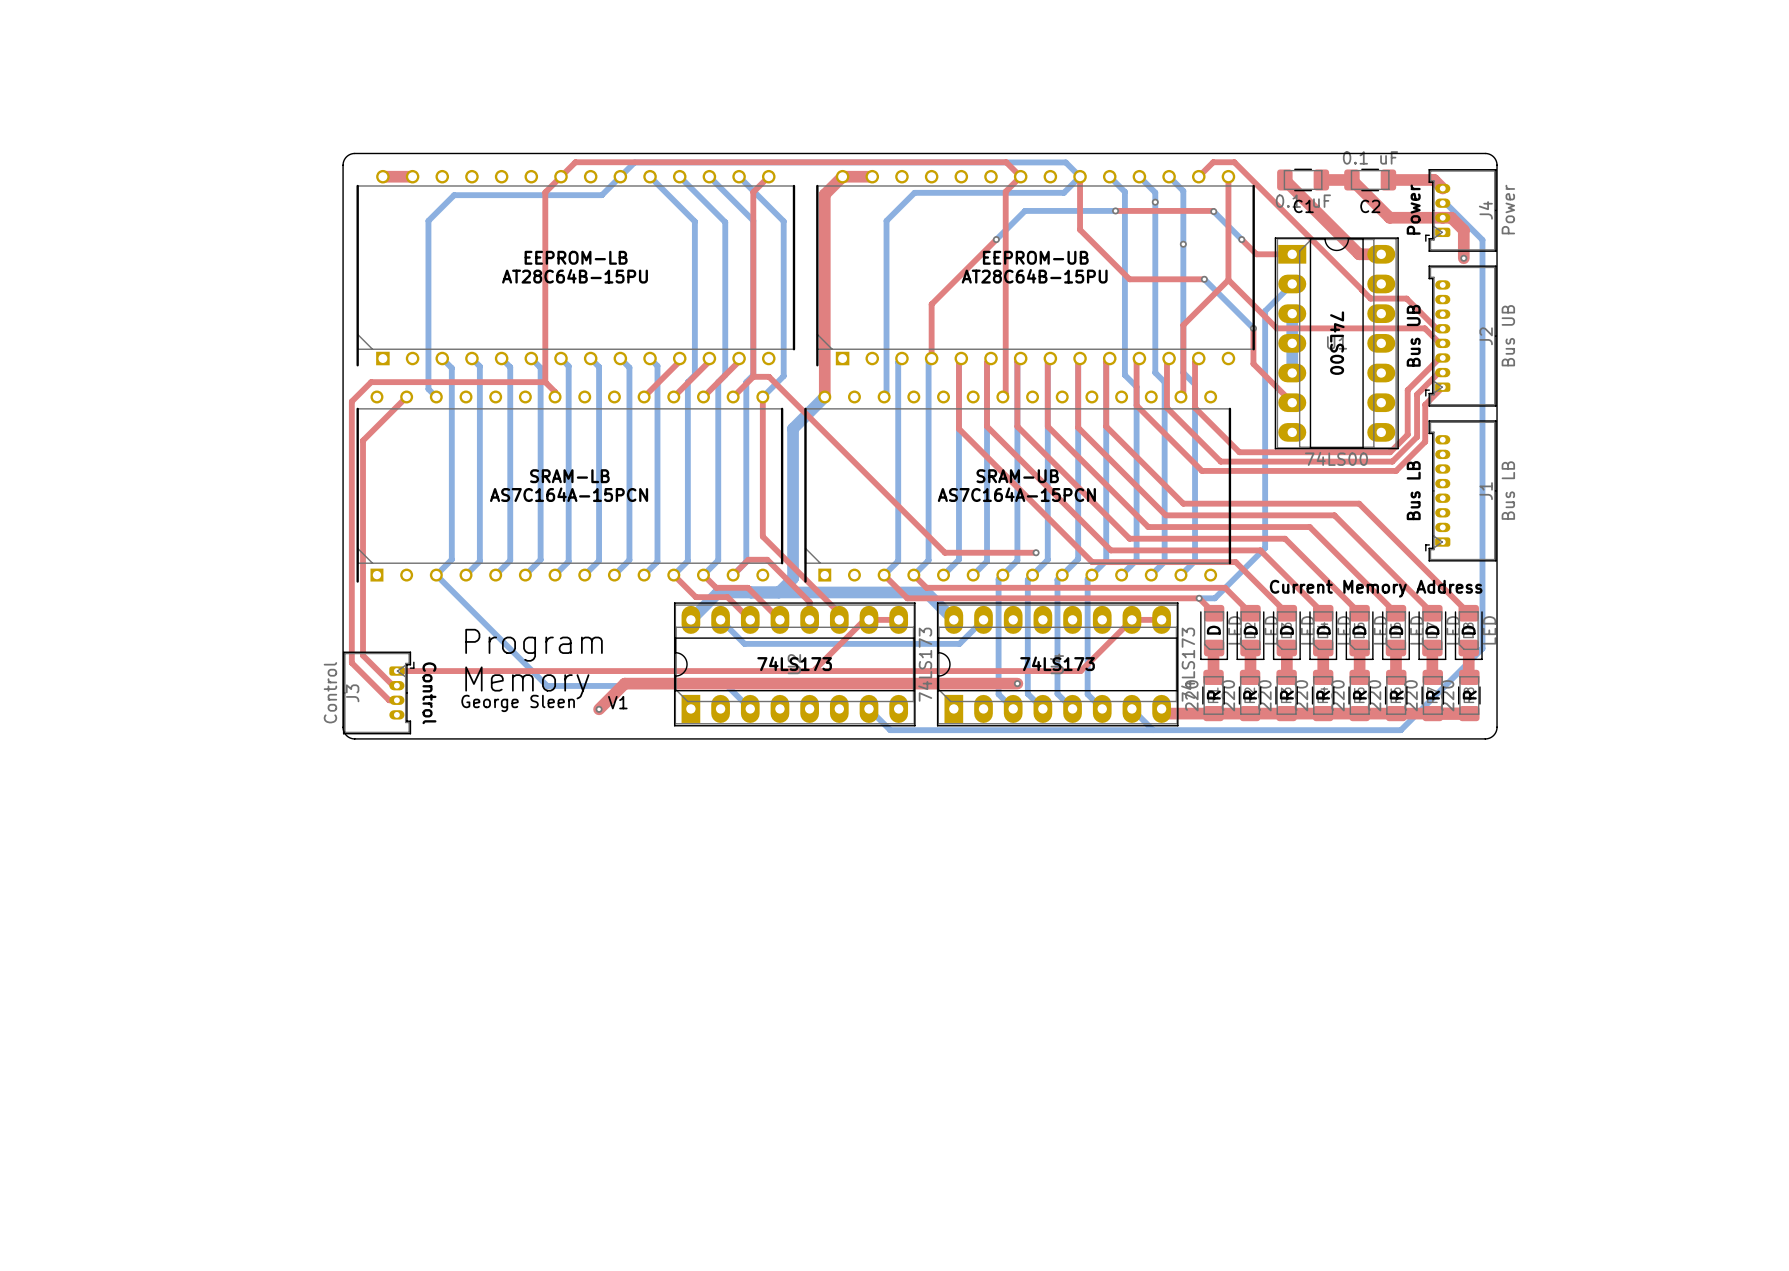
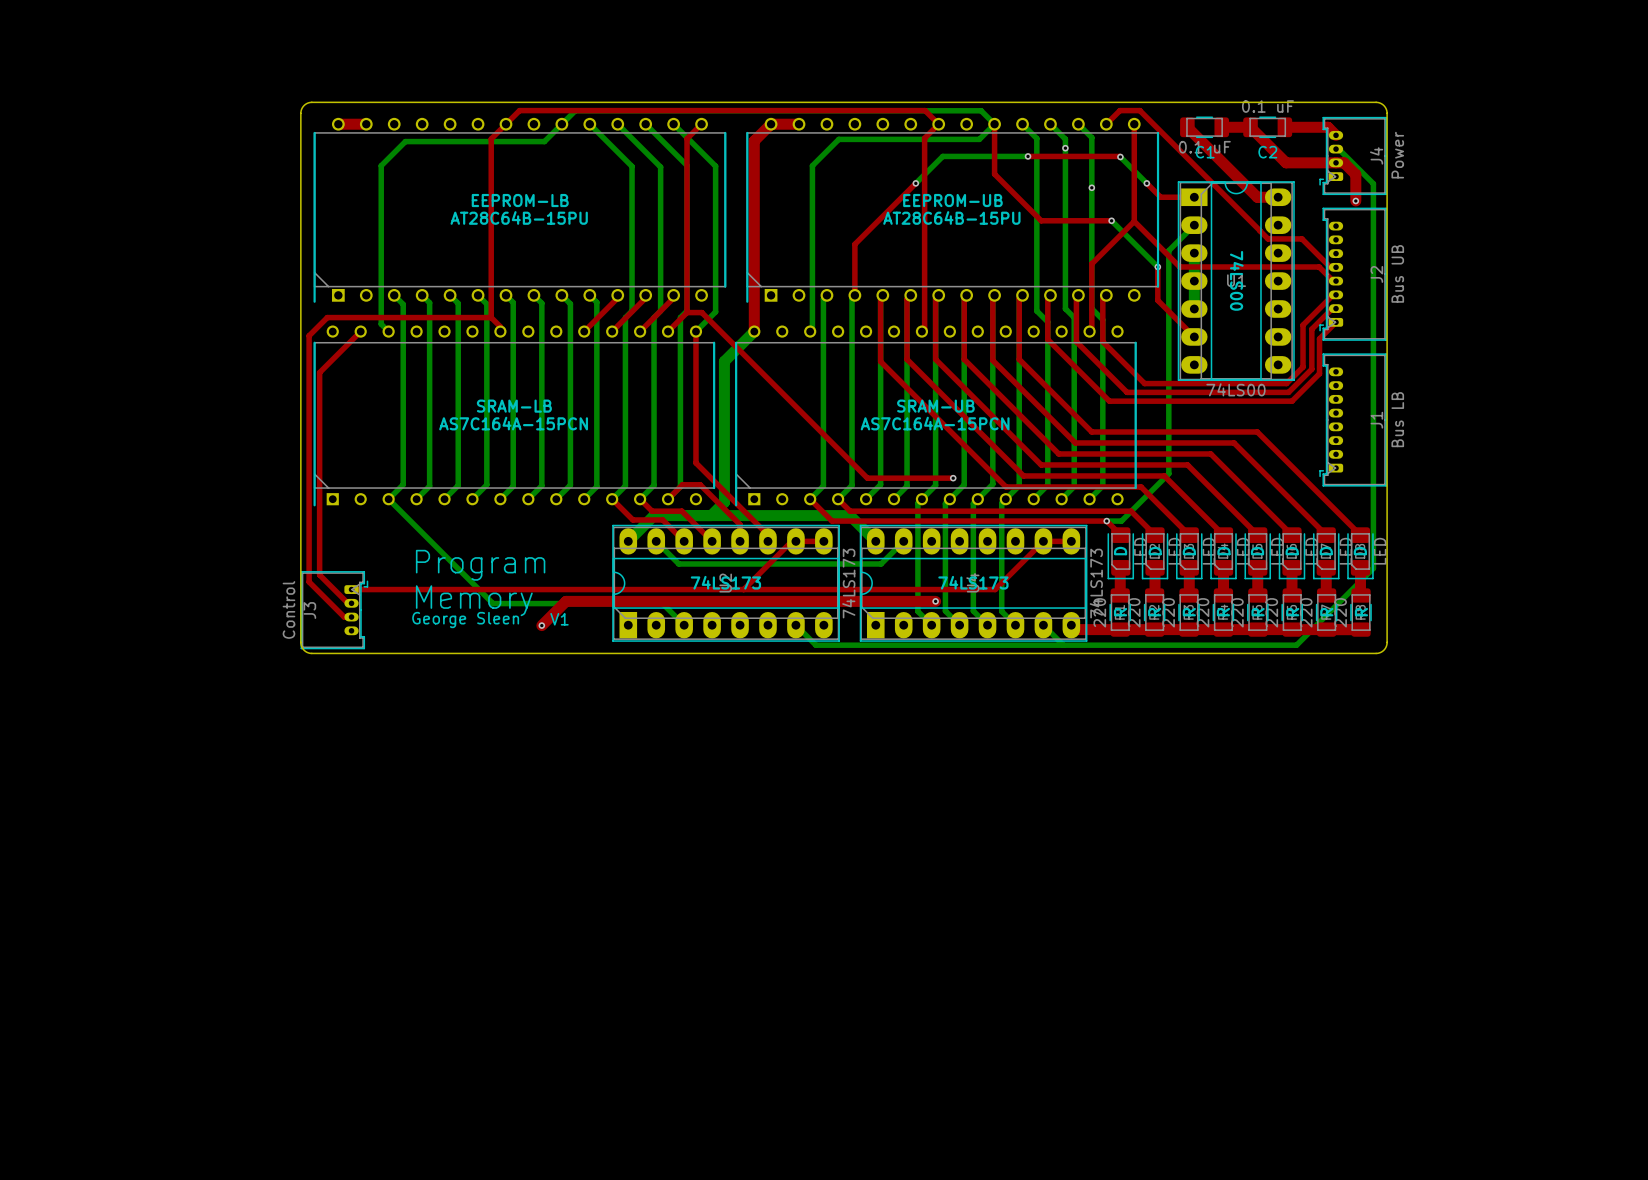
text: Power (1413, 209) -> none
text: Bus UB (1413, 335) -> none
text: Bus LB (1413, 490) -> none
text: Current Memory Address (1376, 588) -> none
text: Control (429, 693) -> none

